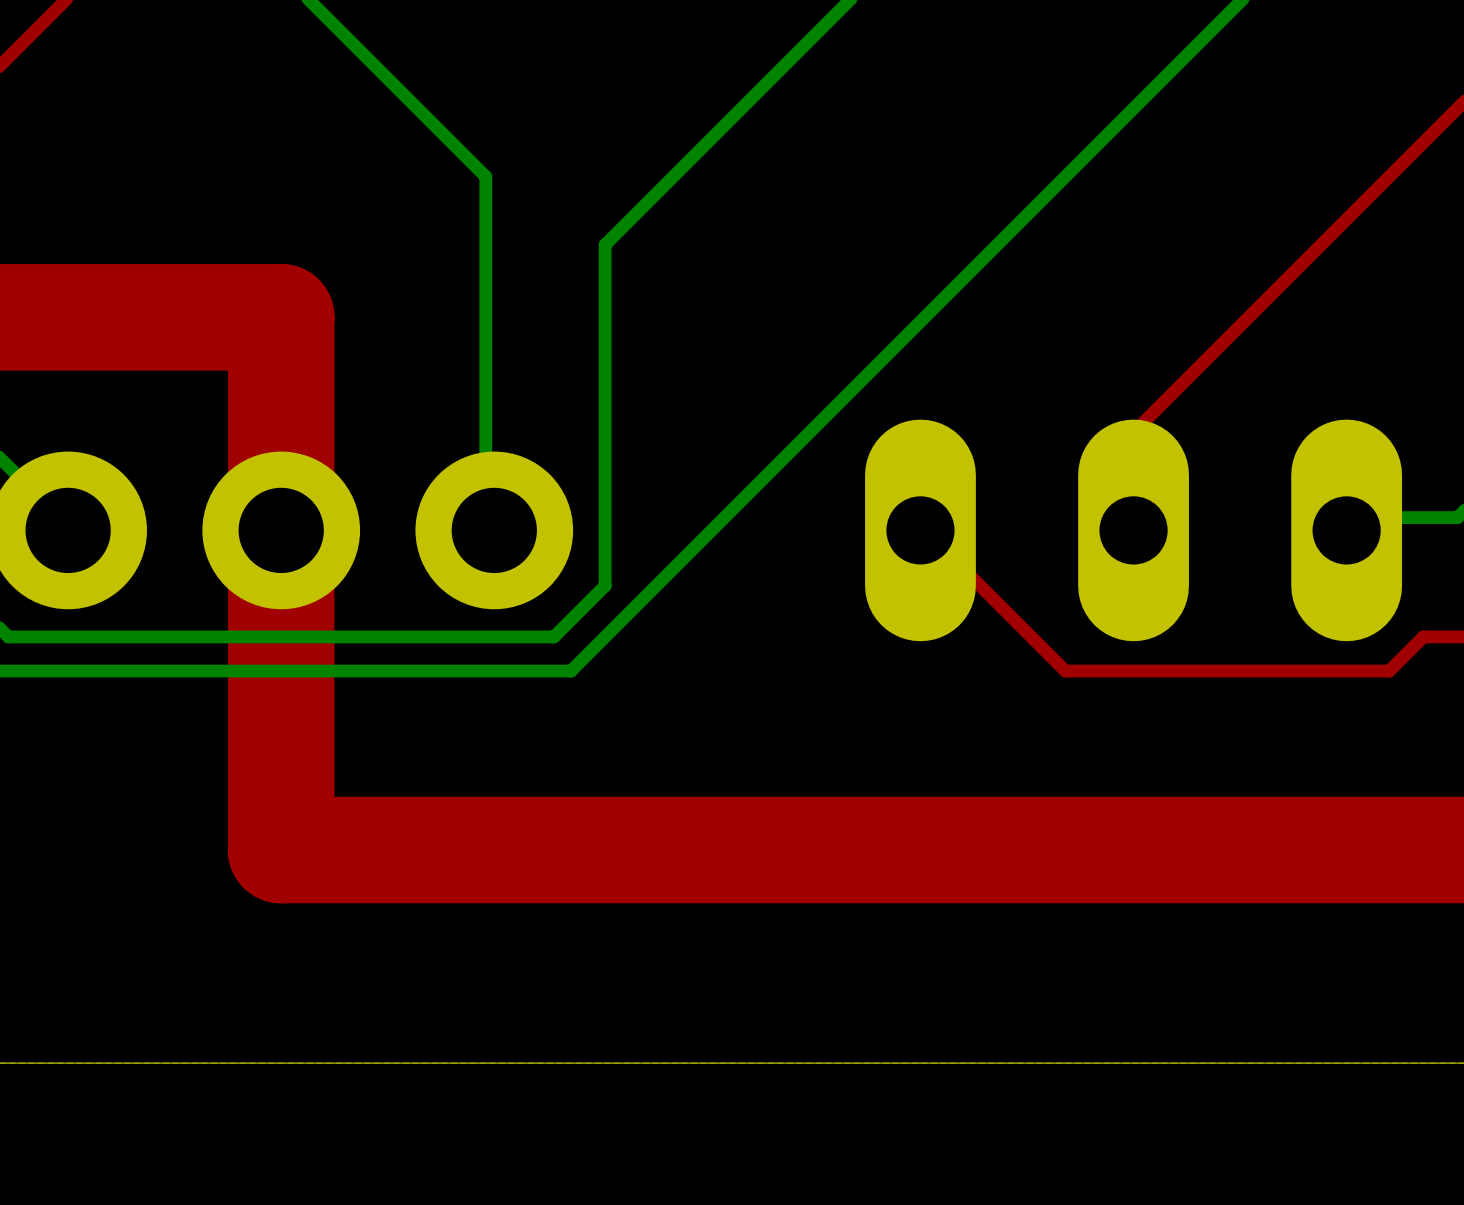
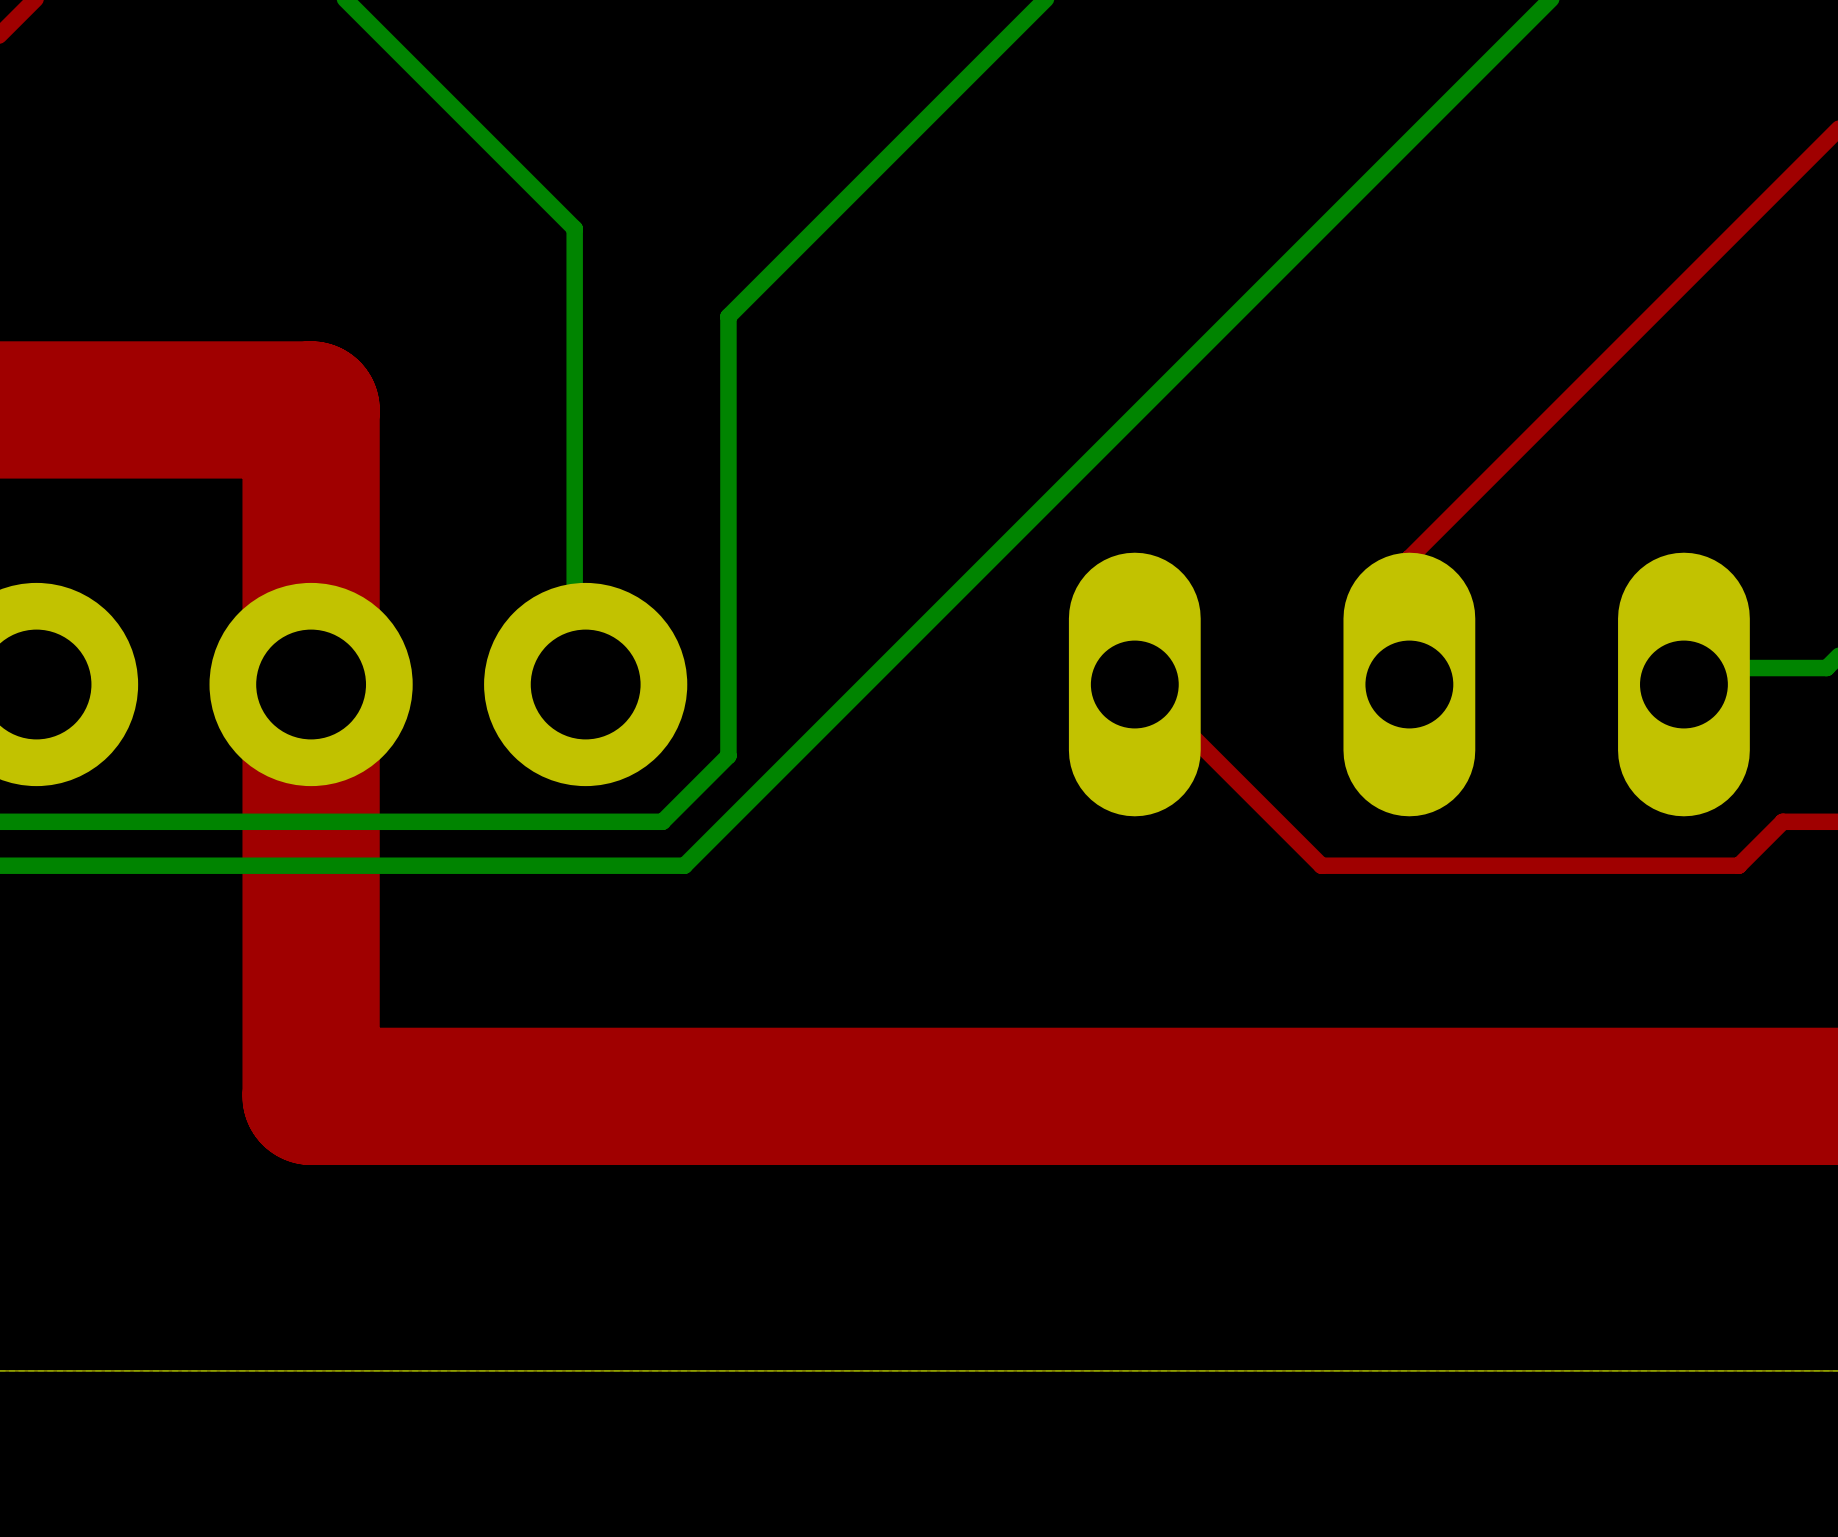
part footprint: [865, 419, 1403, 642] -> [1068, 552, 1750, 817]

